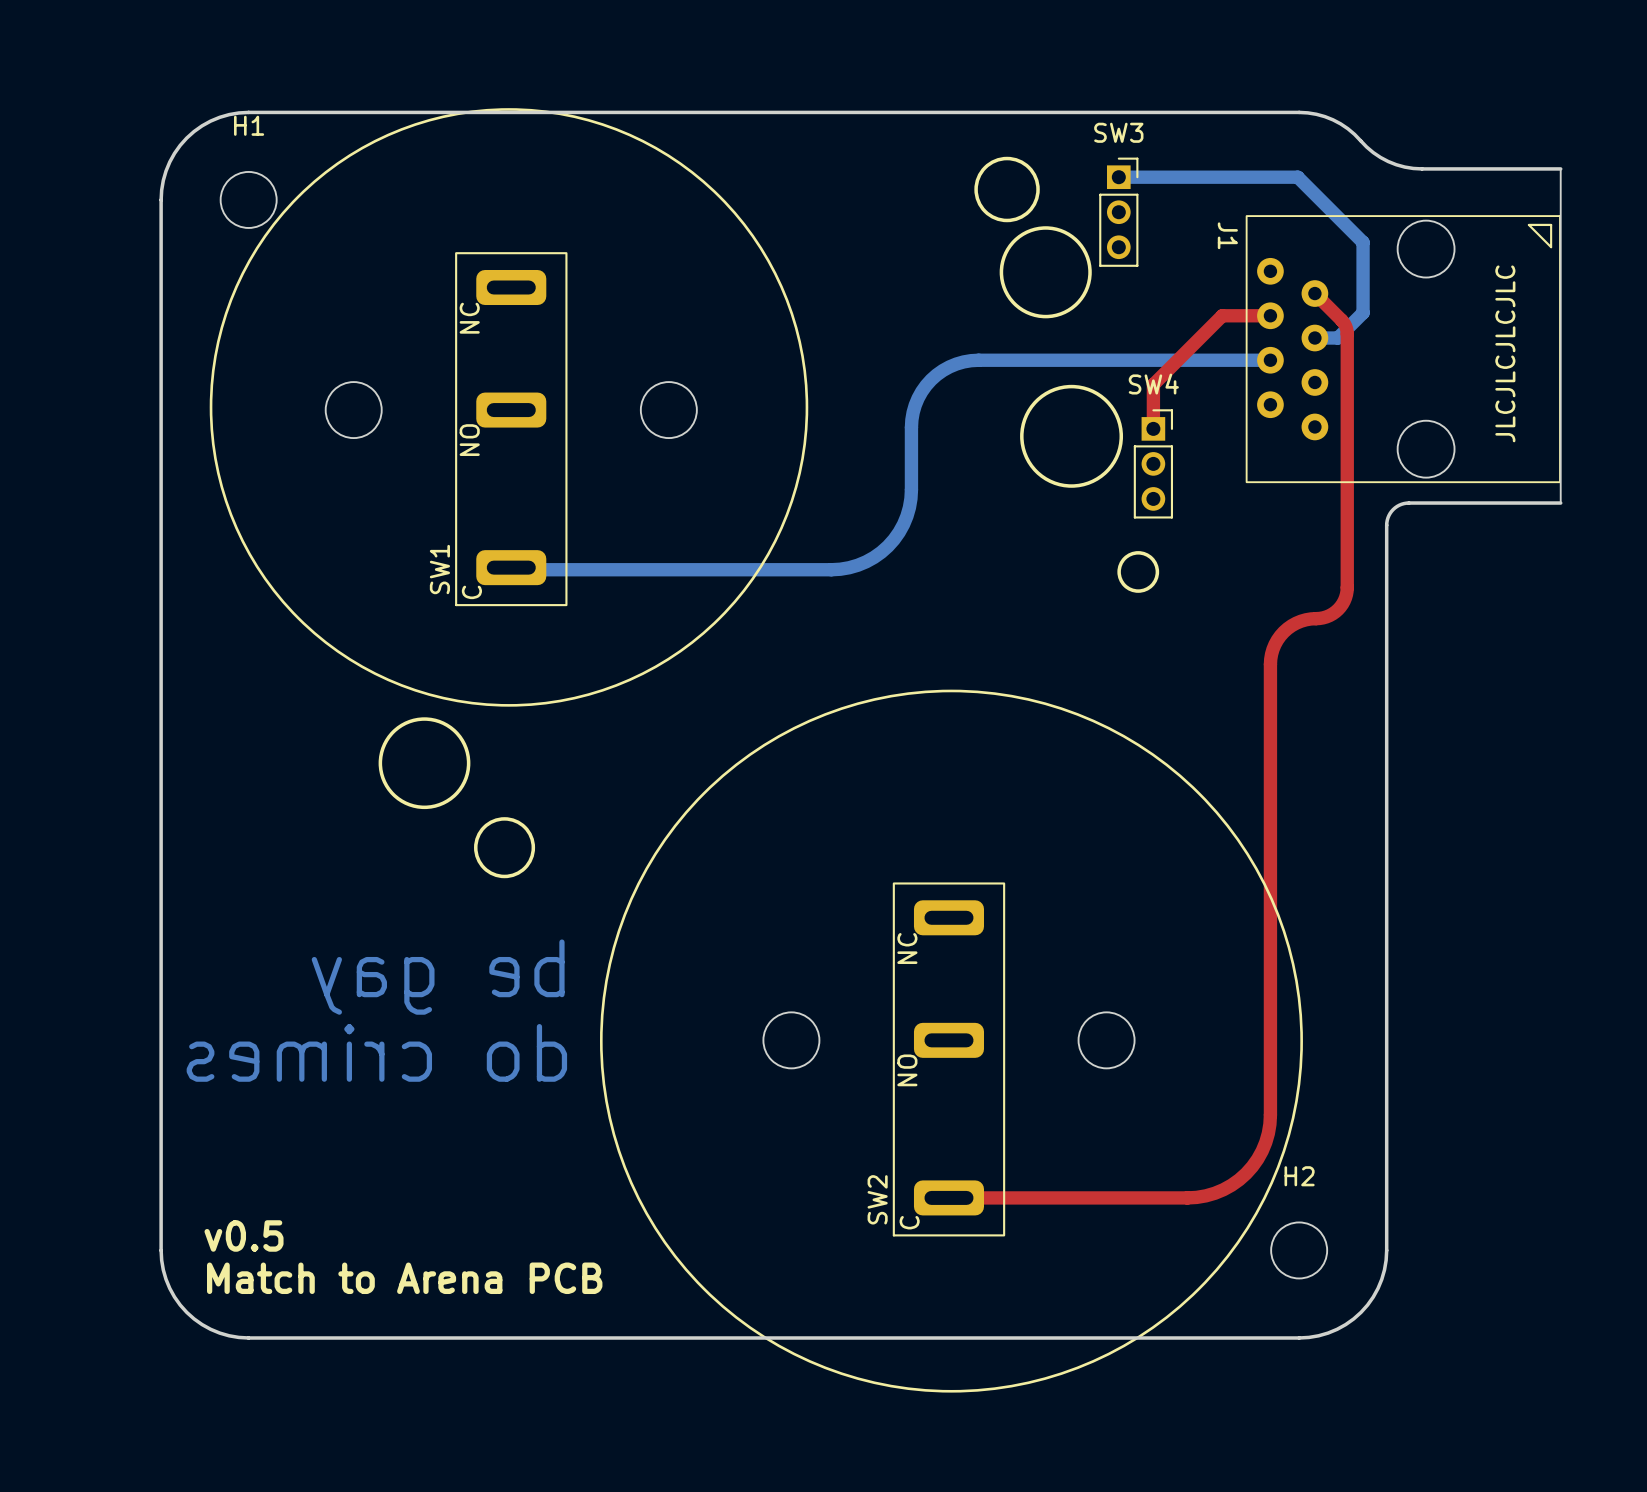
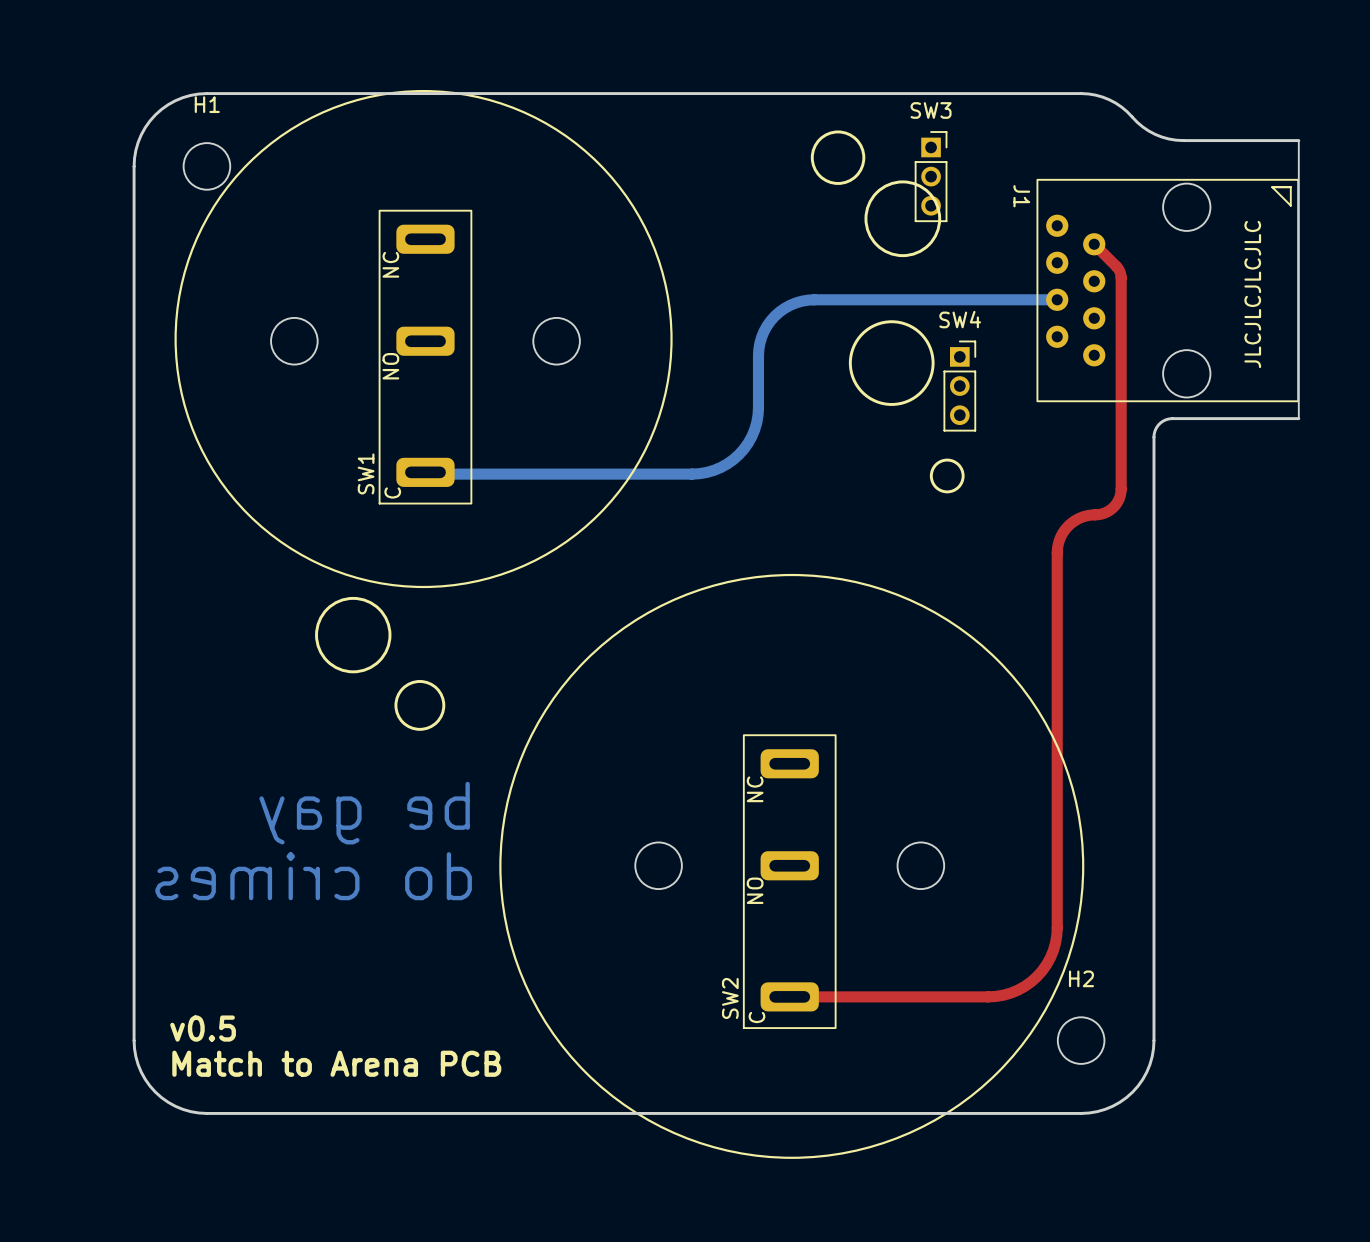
bottom track: (1118, 177) (1297, 177) (1363, 242) (1363, 312) (1337, 338) (1314, 338) -> none
drawing position: (1045, 272) -> (902, 218)
top track: (1270, 315) (1222, 315) (1153, 384) (1153, 428) -> none

